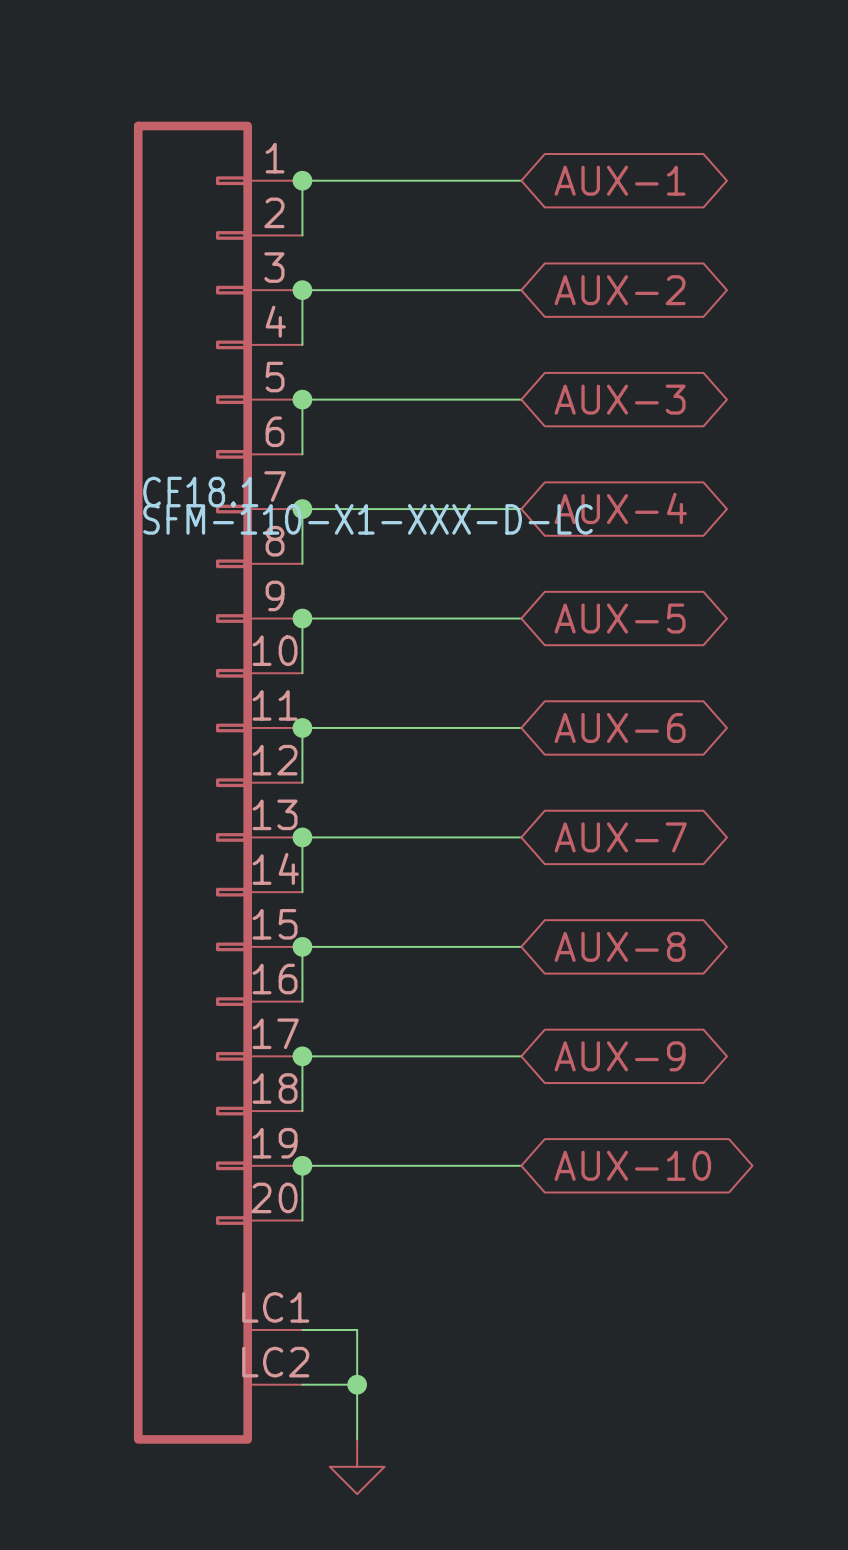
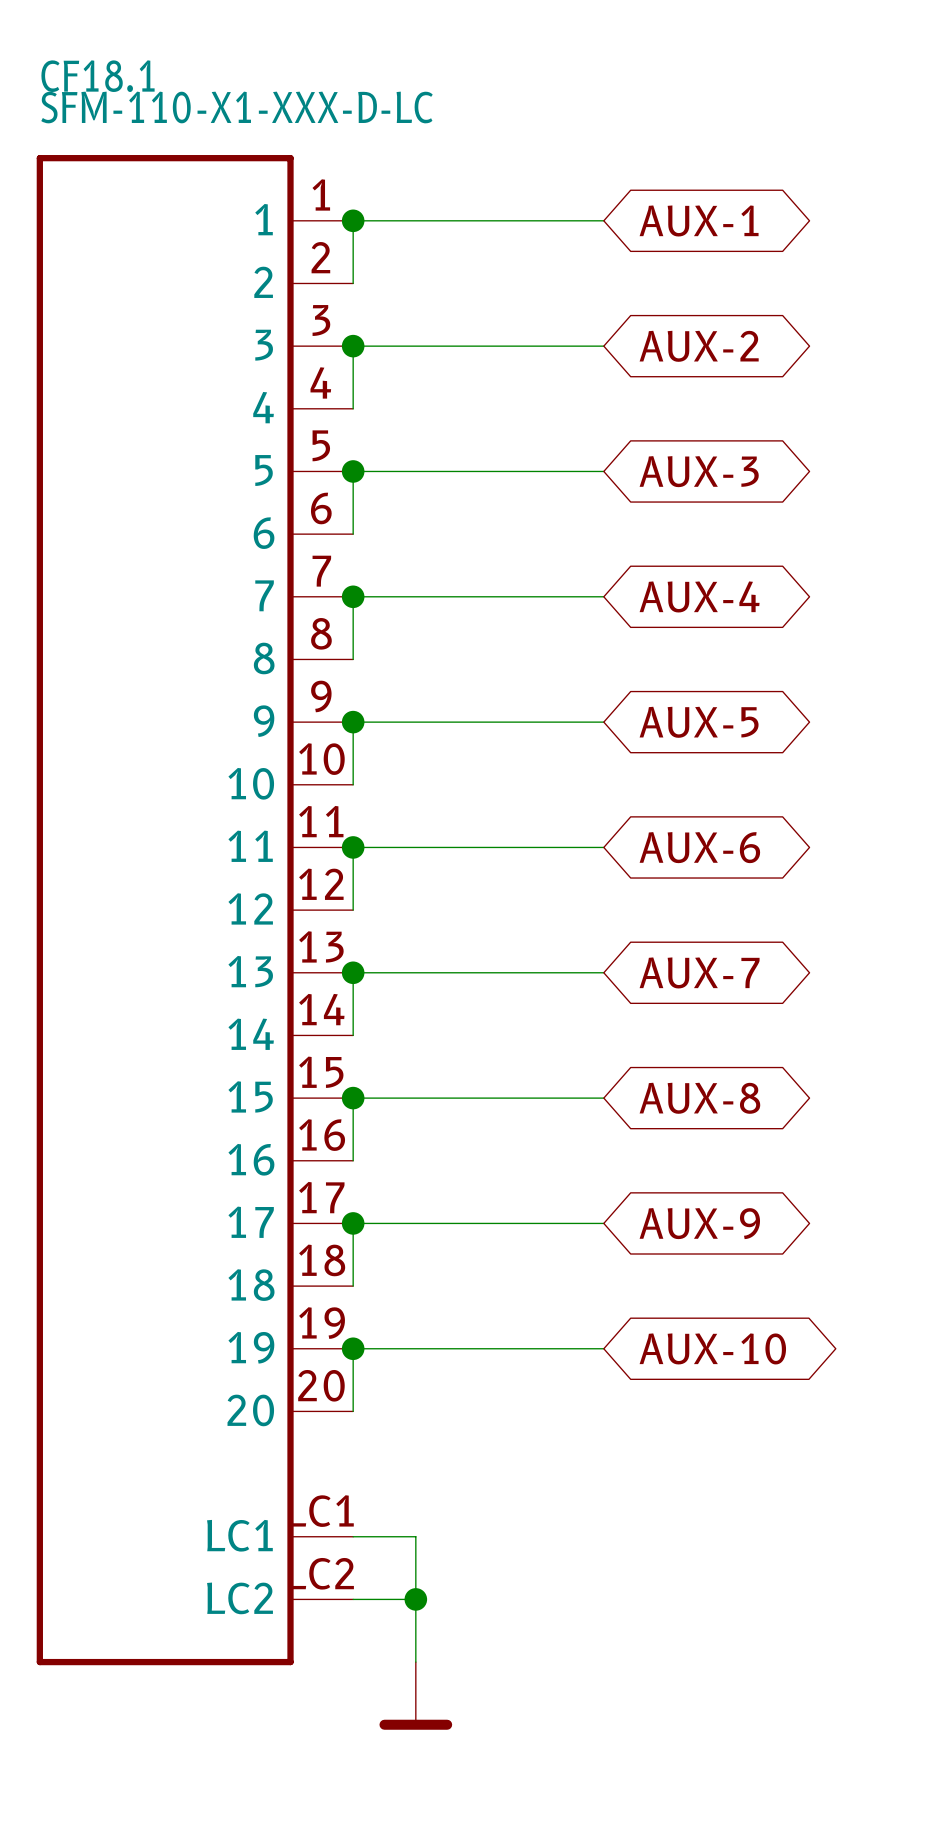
CF18.1 symbol: [133, 121, 303, 1444] -> [36, 155, 354, 1666]
CF18.1 name position: CF18.1 (200, 492) -> CF18.1 (98, 76)
CF18.1 value position: SFM-110-X1-XXX-D-LC (368, 519) -> SFM-110-X1-XXX-D-LC (237, 107)
power symbol shape: [329, 1439, 385, 1495] -> [379, 1662, 453, 1730]

